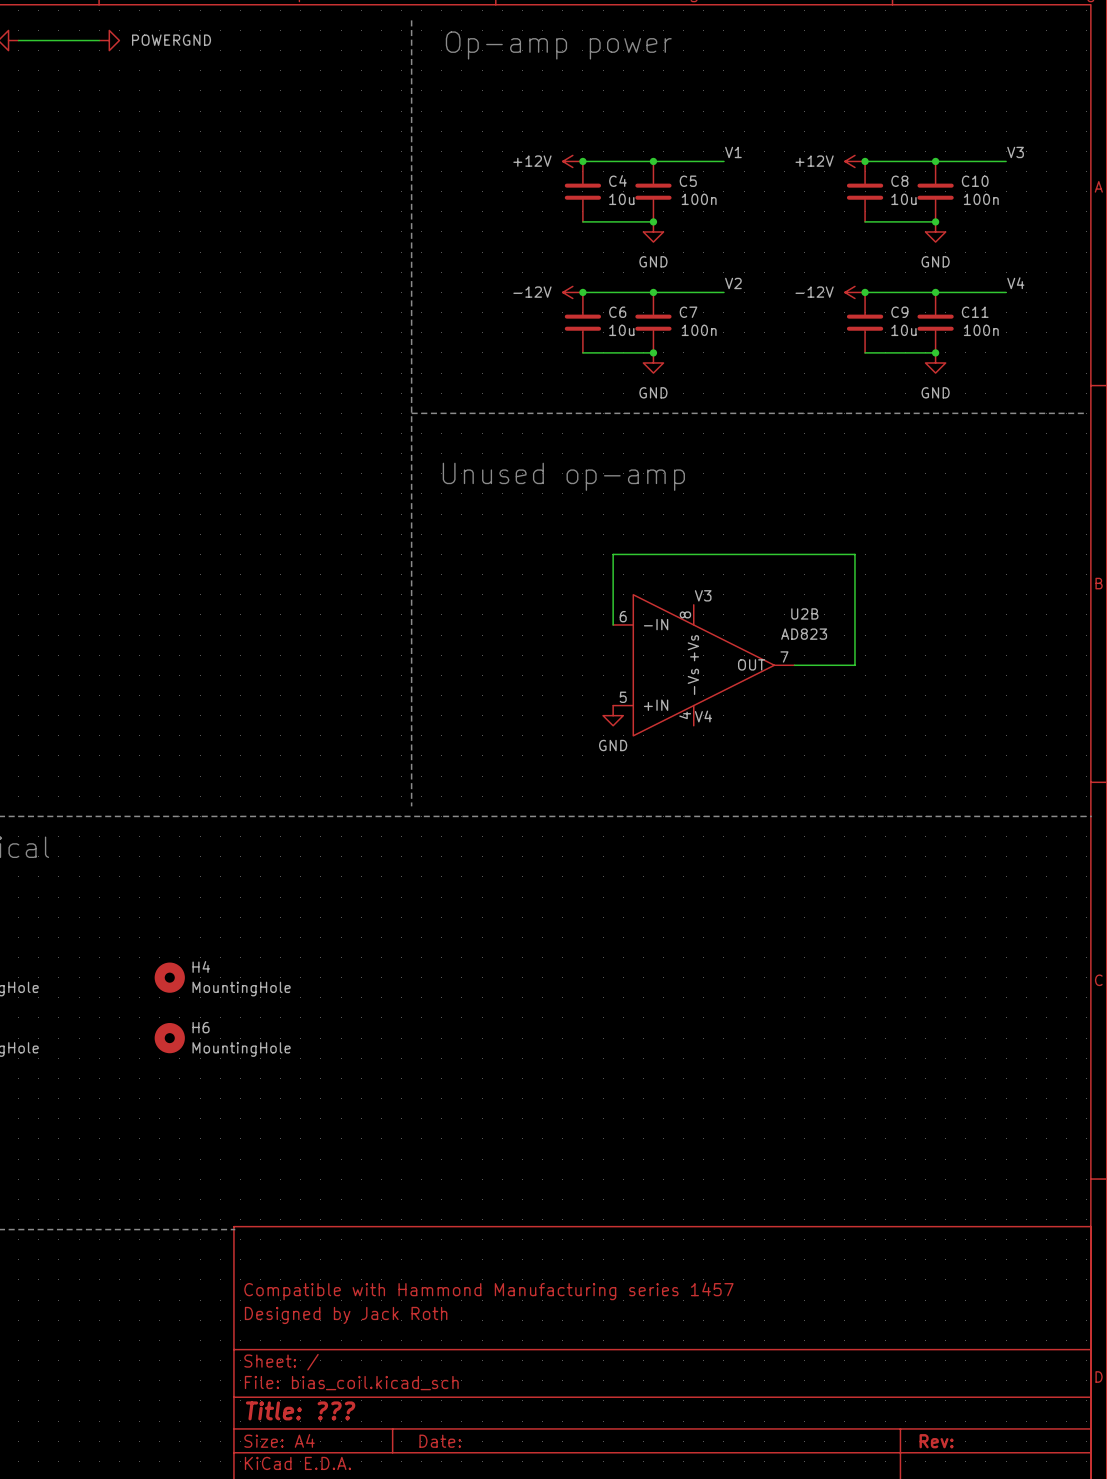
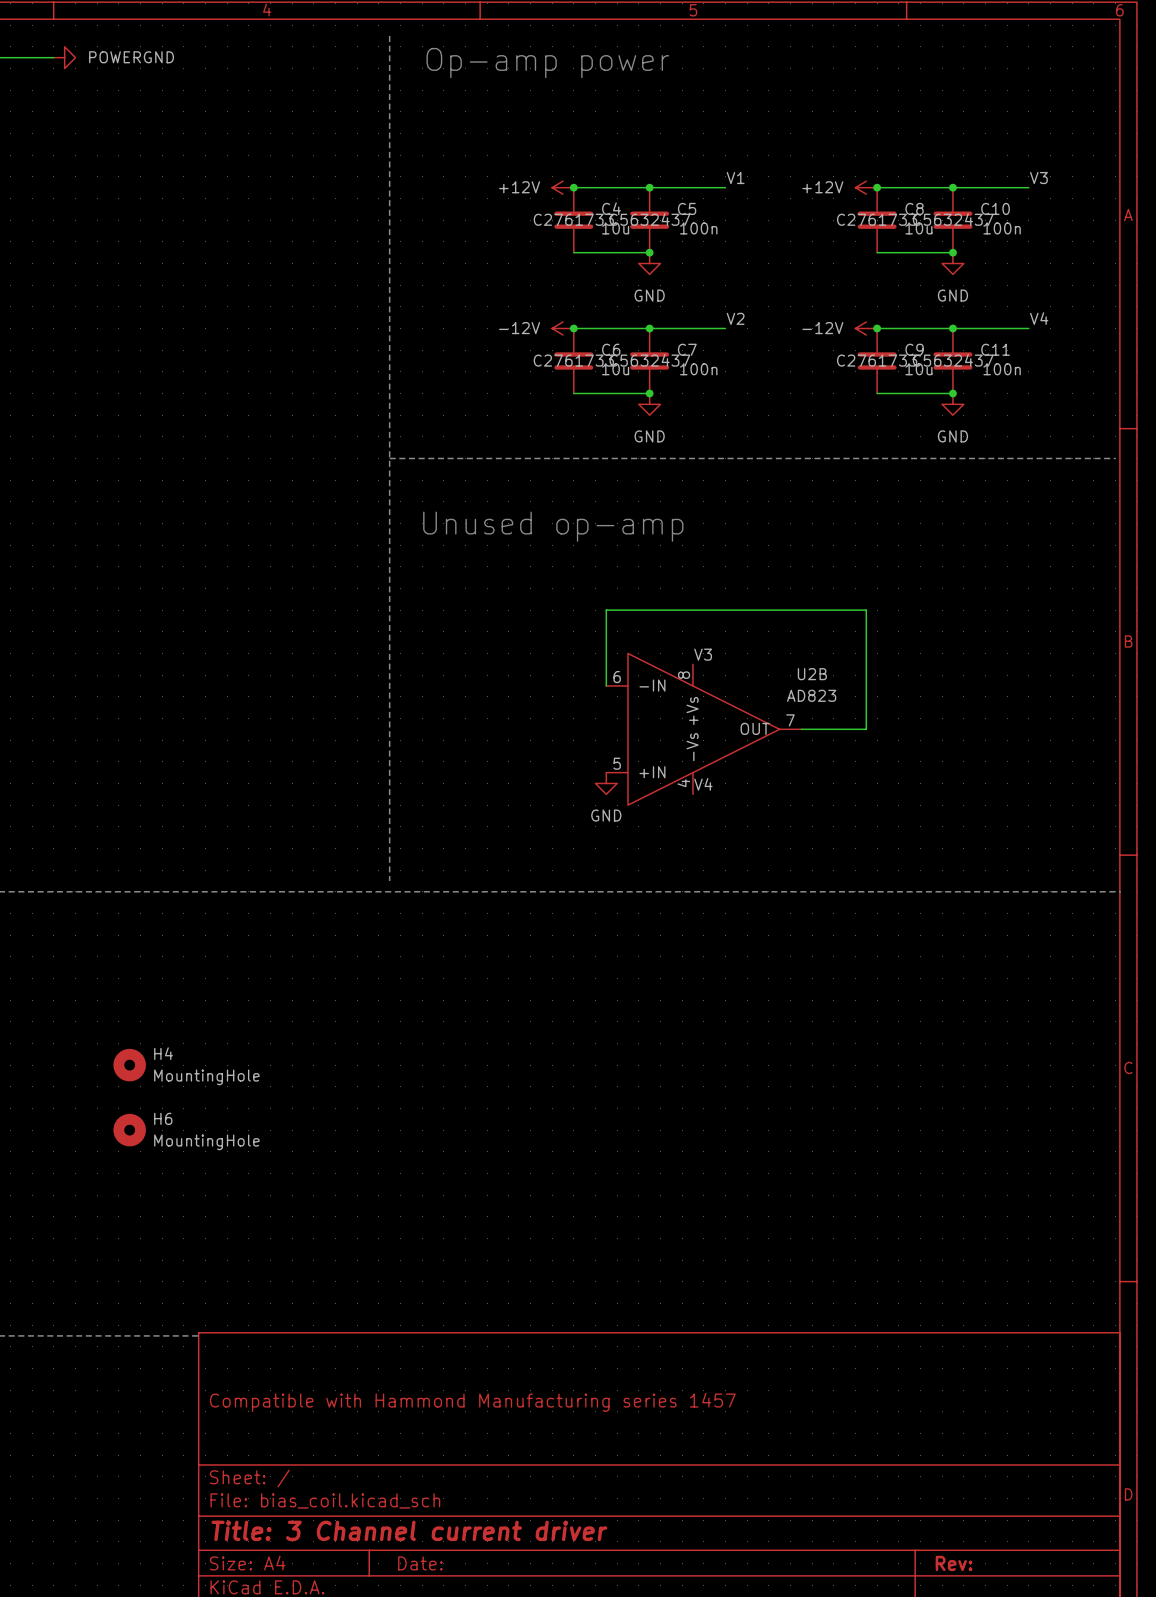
C4 text: none -> C2761733 (573, 219)
C5 text: none -> C5632437 (649, 219)
C8 text: none -> C2761733 (877, 219)
C10 text: none -> C5632437 (953, 219)
C6 text: none -> C2761733 (573, 360)
C7 text: none -> C5632437 (649, 360)
C9 text: none -> C2761733 (877, 360)
C11 text: none -> C5632437 (953, 360)
title block: Designed by Jack Roth (346, 1315) -> none
title block: Title: ??? (300, 1410) -> Title: 3 Channel current driver (409, 1530)

